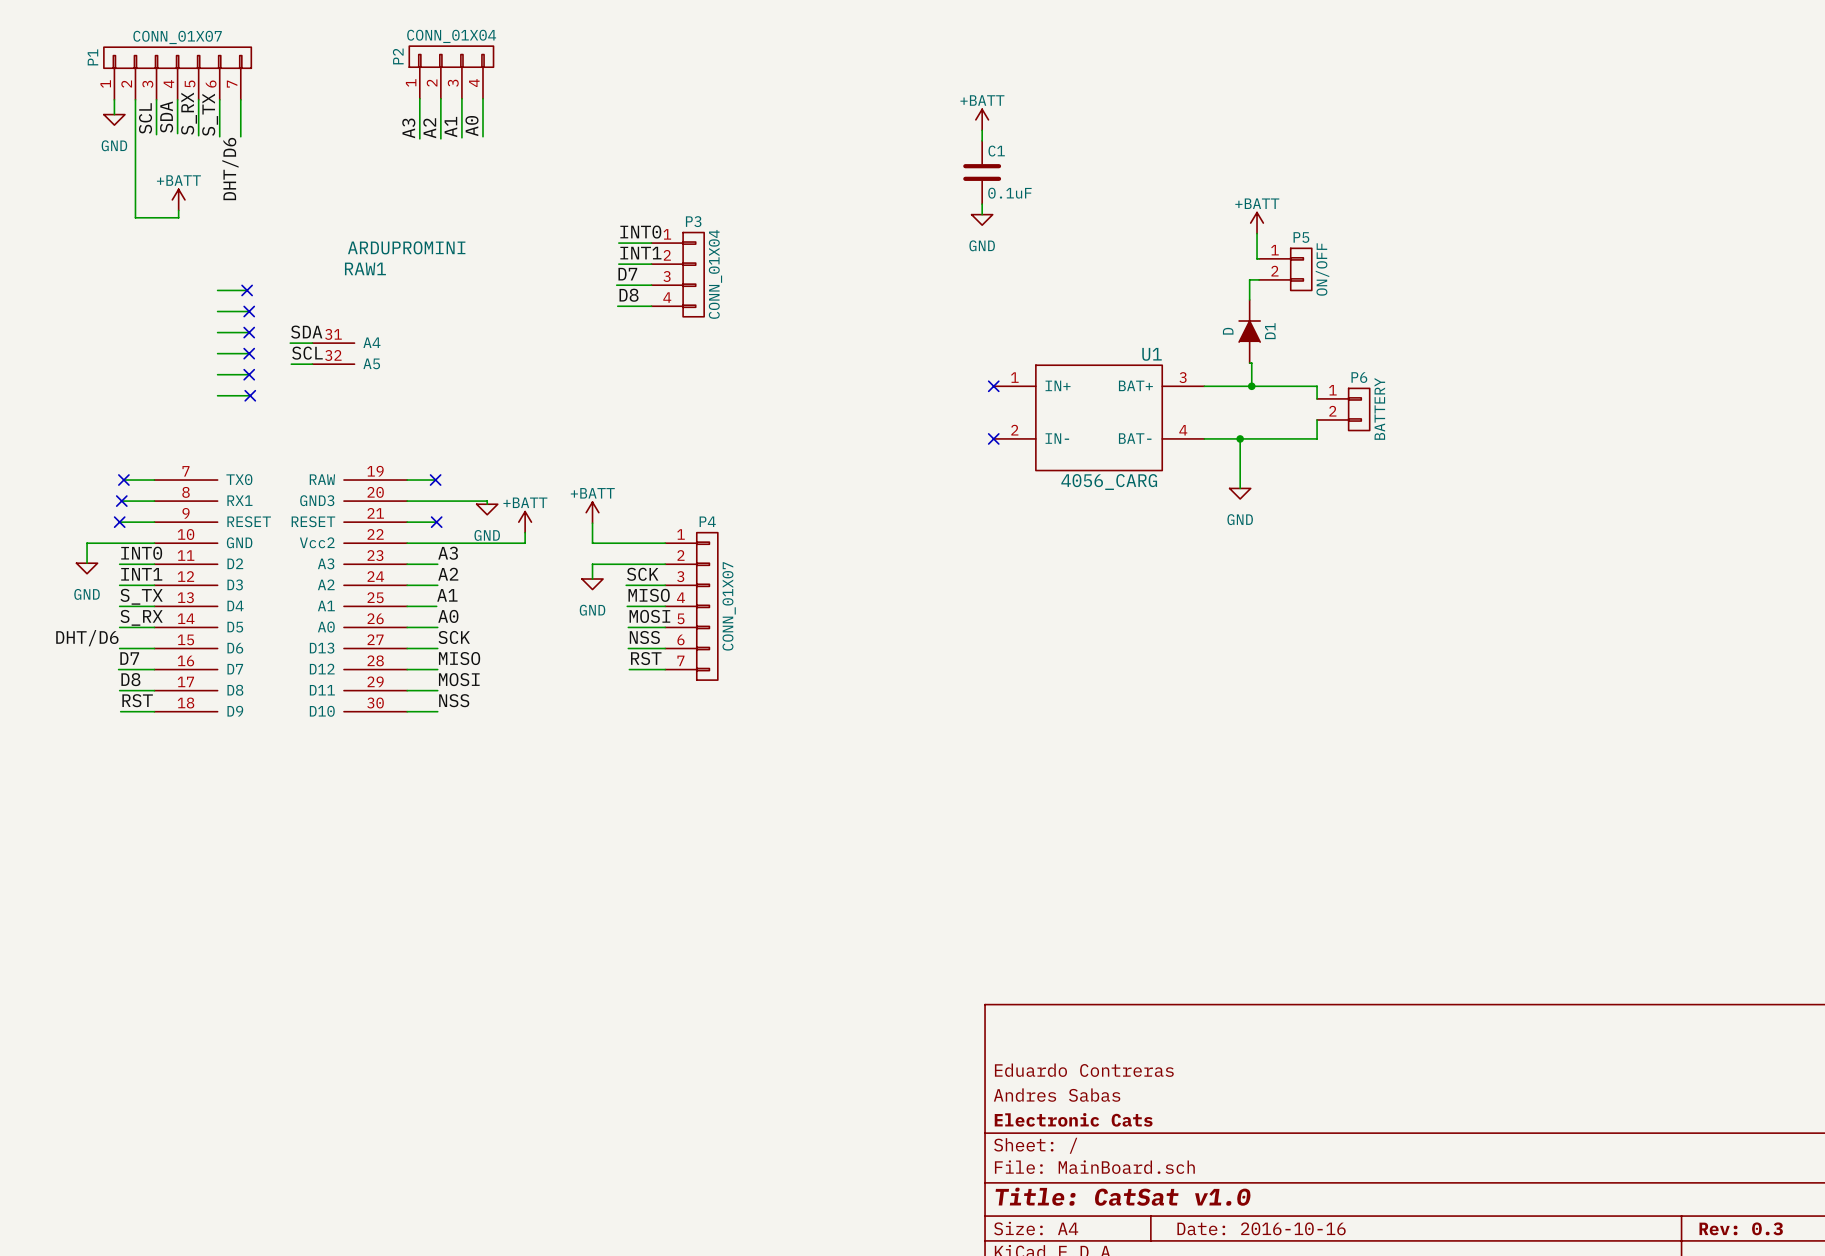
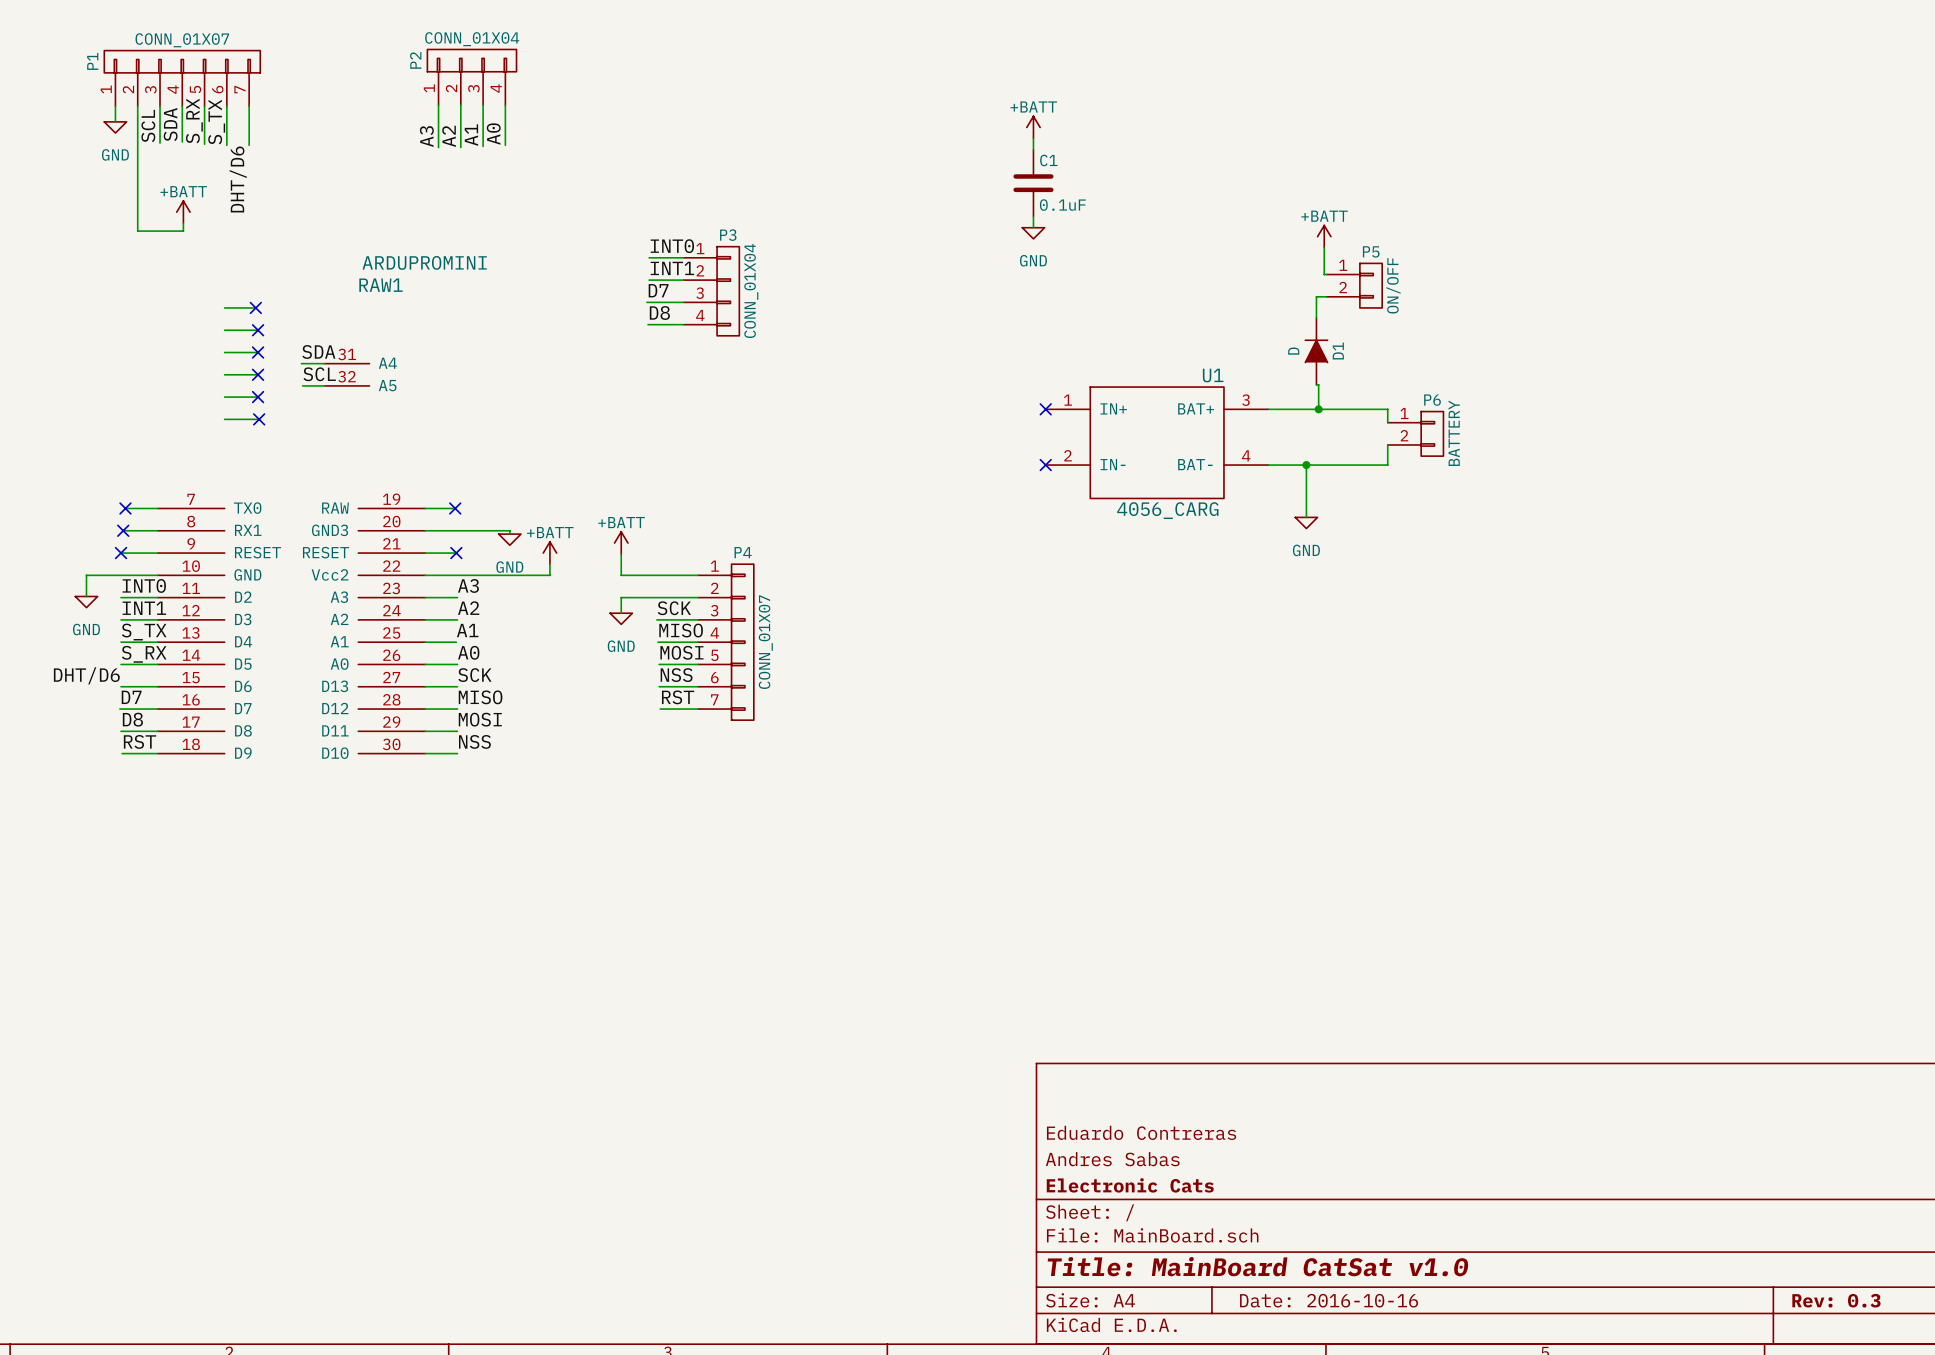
title block: Title: CatSat v1.0 (1123, 1196) -> Title: MainBoard CatSat v1.0 (1258, 1266)

